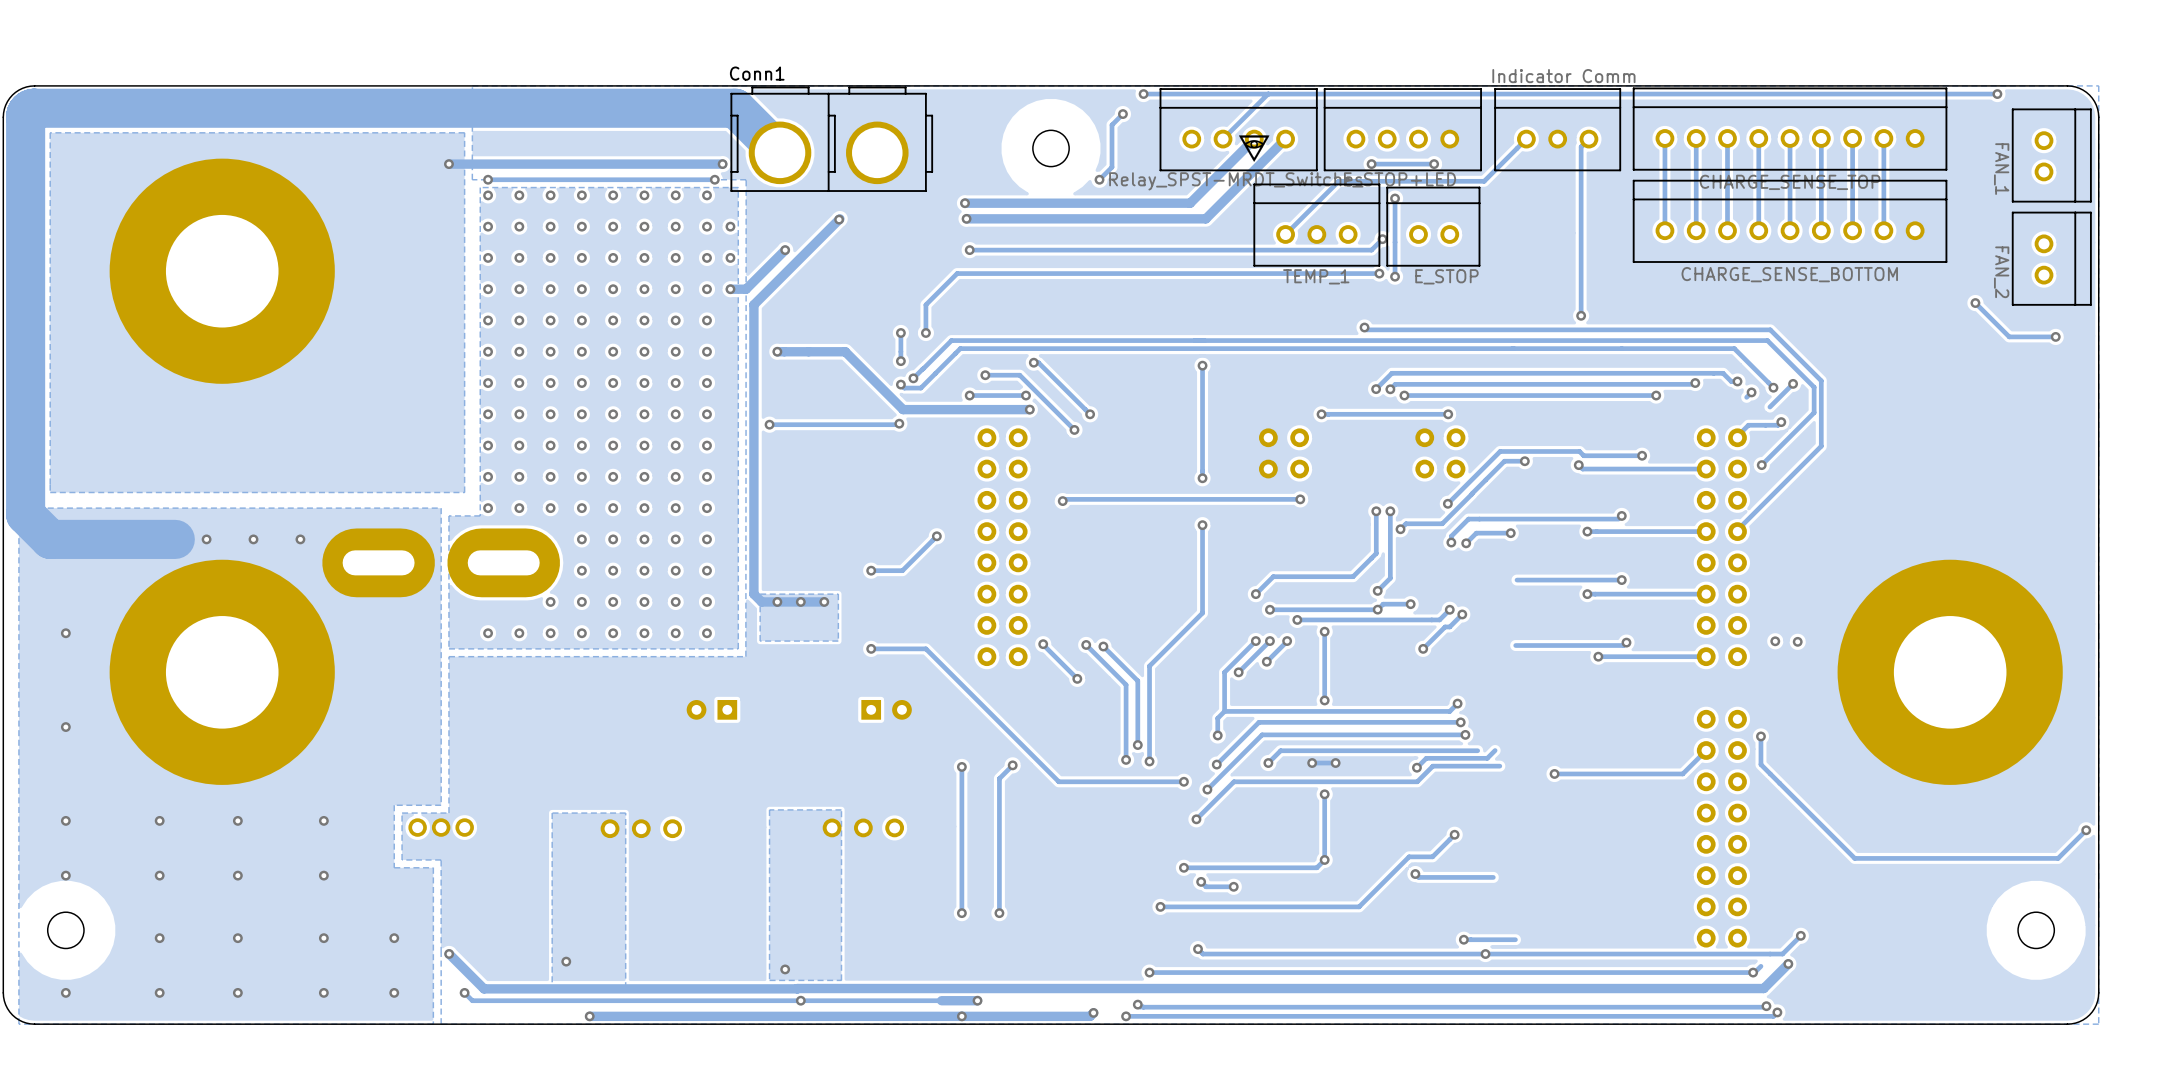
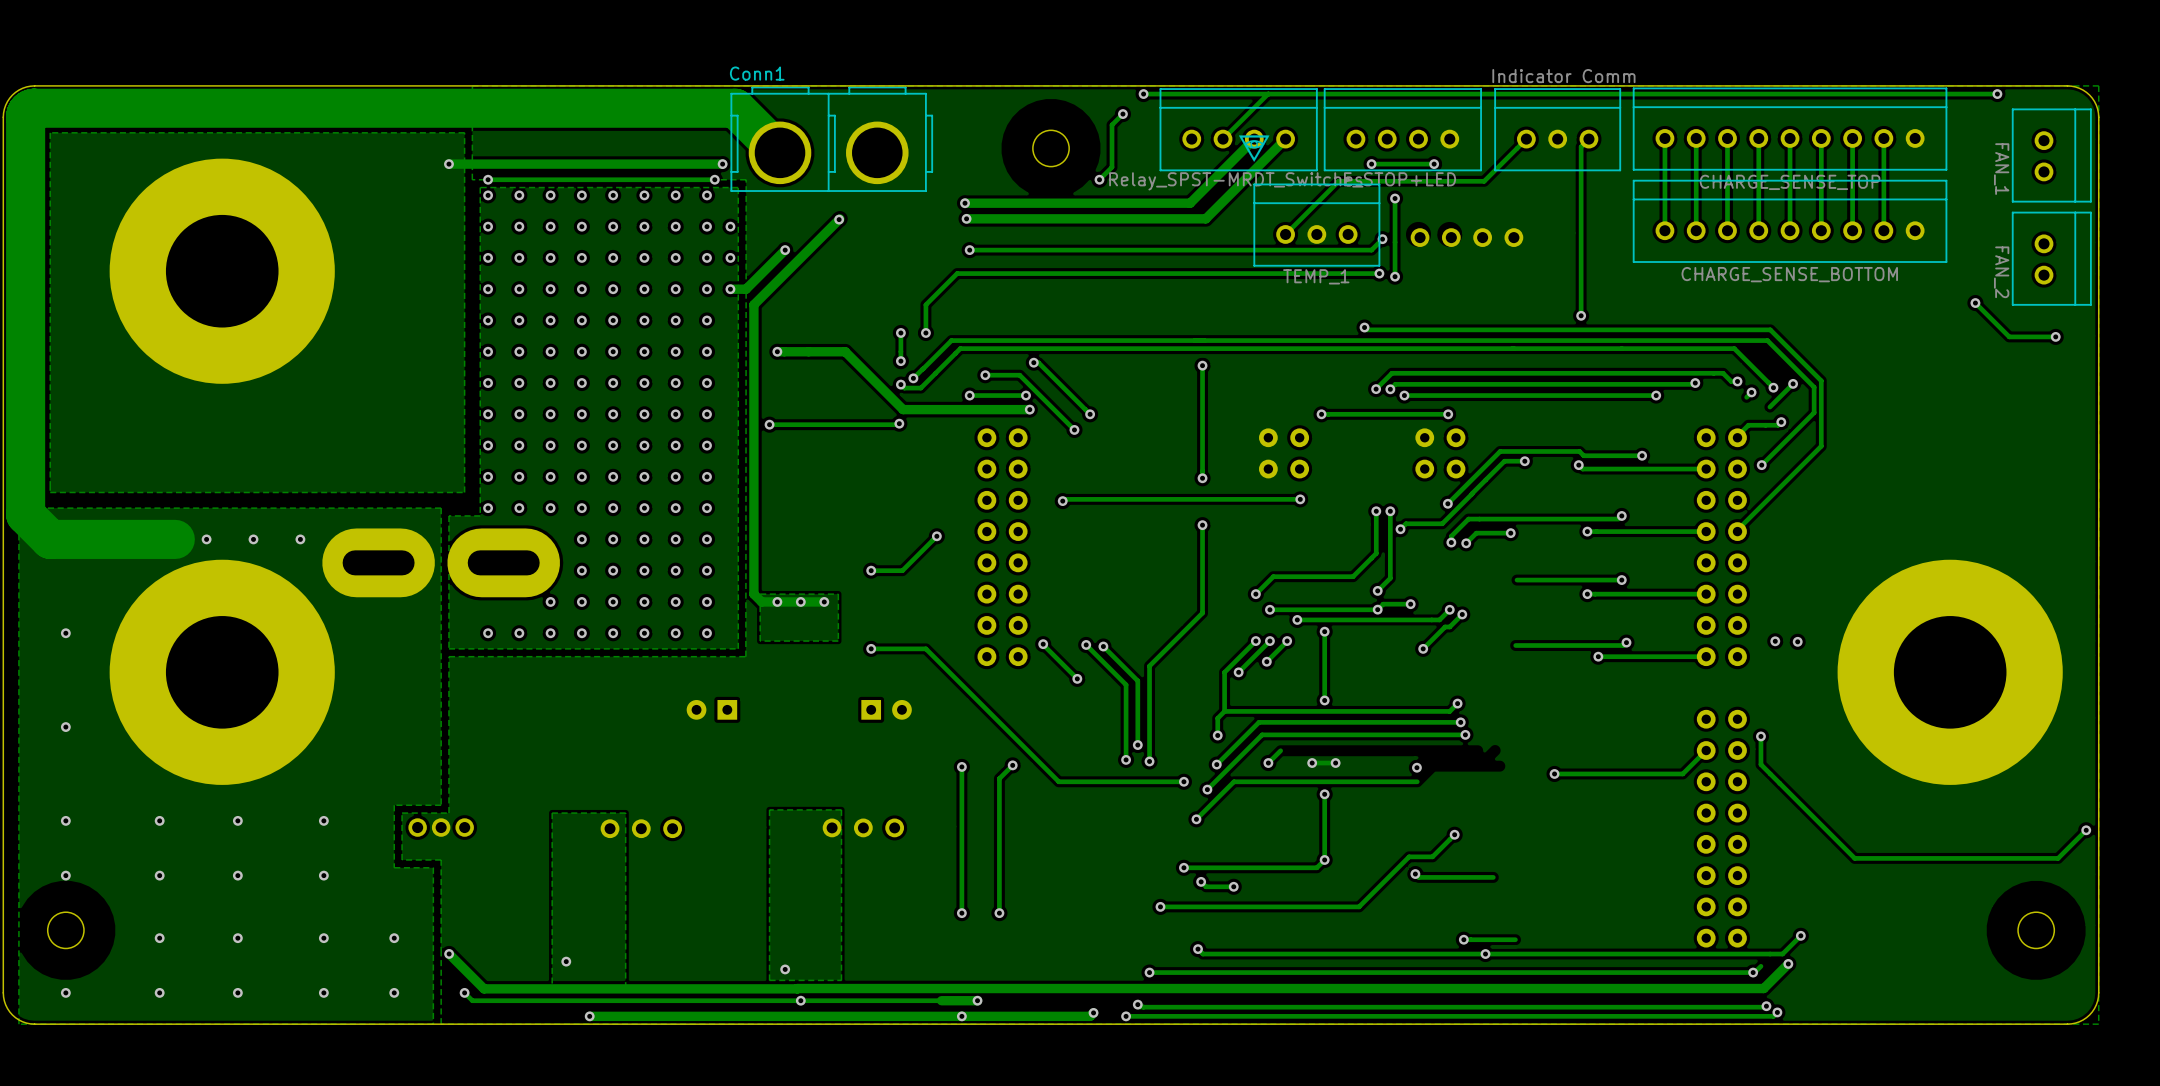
part: E_STOP (1433, 226) -> none
part: none -> (1466, 237)
track: (1477, 750) (1280, 750) -> none
track: (1495, 750) (1487, 758) (1426, 758) (1416, 767) -> none
track: (1499, 766) (1432, 766) (1417, 781) -> none

